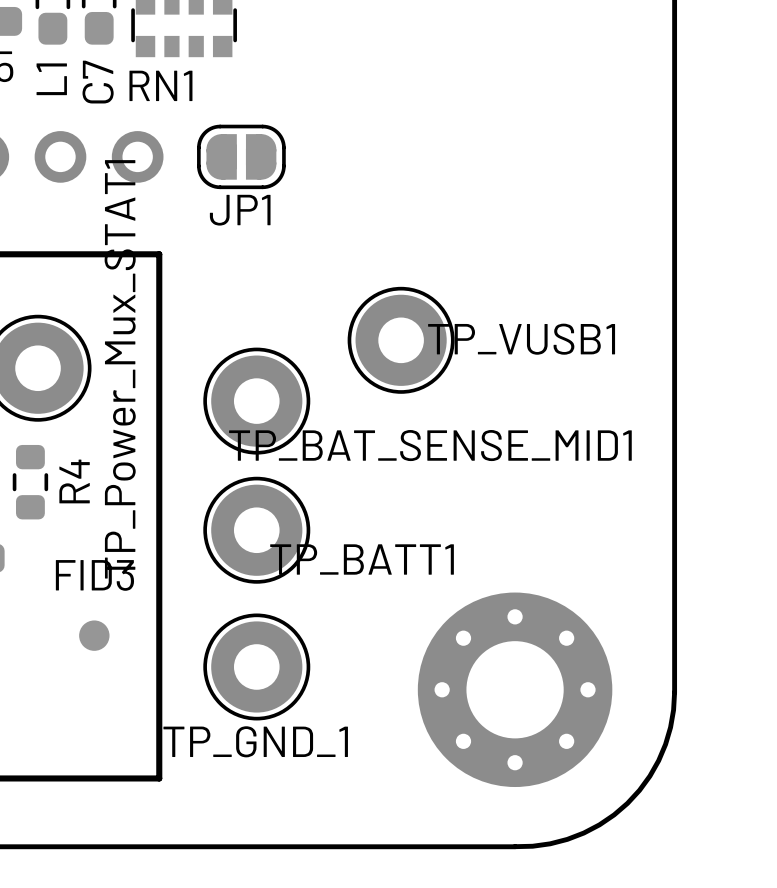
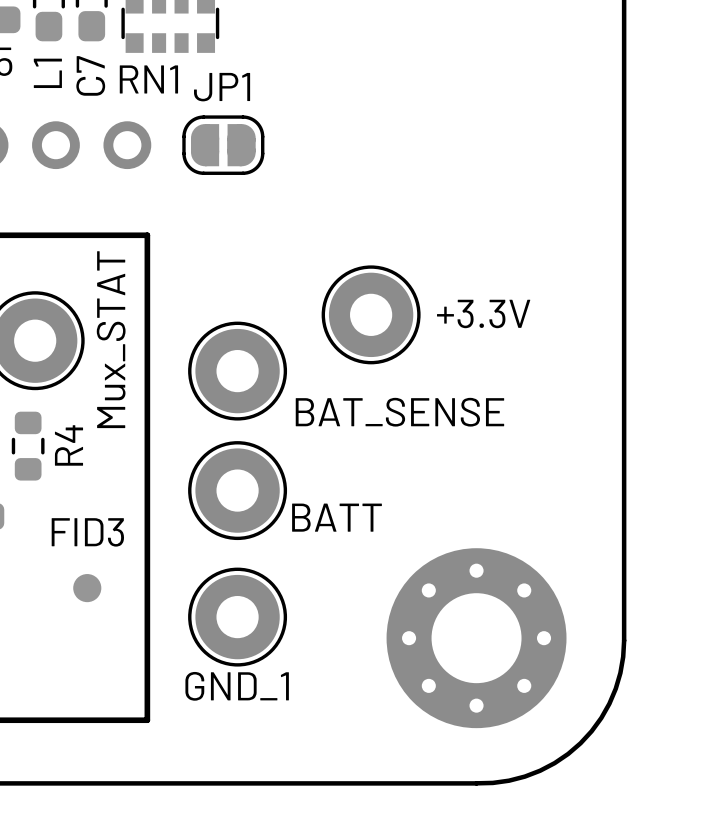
JP1 name position: JP1 (240, 210) -> JP1 (222, 87)
TP_VUSB1 name: TP_VUSB1 (521, 339) -> +3.3V (483, 313)
TP_Power_Mux_STAT1 name: TP_Power_Mux_STAT1 (120, 369) -> Mux_STAT (111, 339)
TP_BAT_SENSE_MID1 name: TP_BAT_SENSE_MID1 (430, 445) -> BAT_SENSE (399, 412)
TP_BATT1 name: TP_BATT1 (362, 559) -> BATT (336, 517)
TP_GND_1 name: TP_GND_1 (255, 741) -> GND_1 (237, 686)

